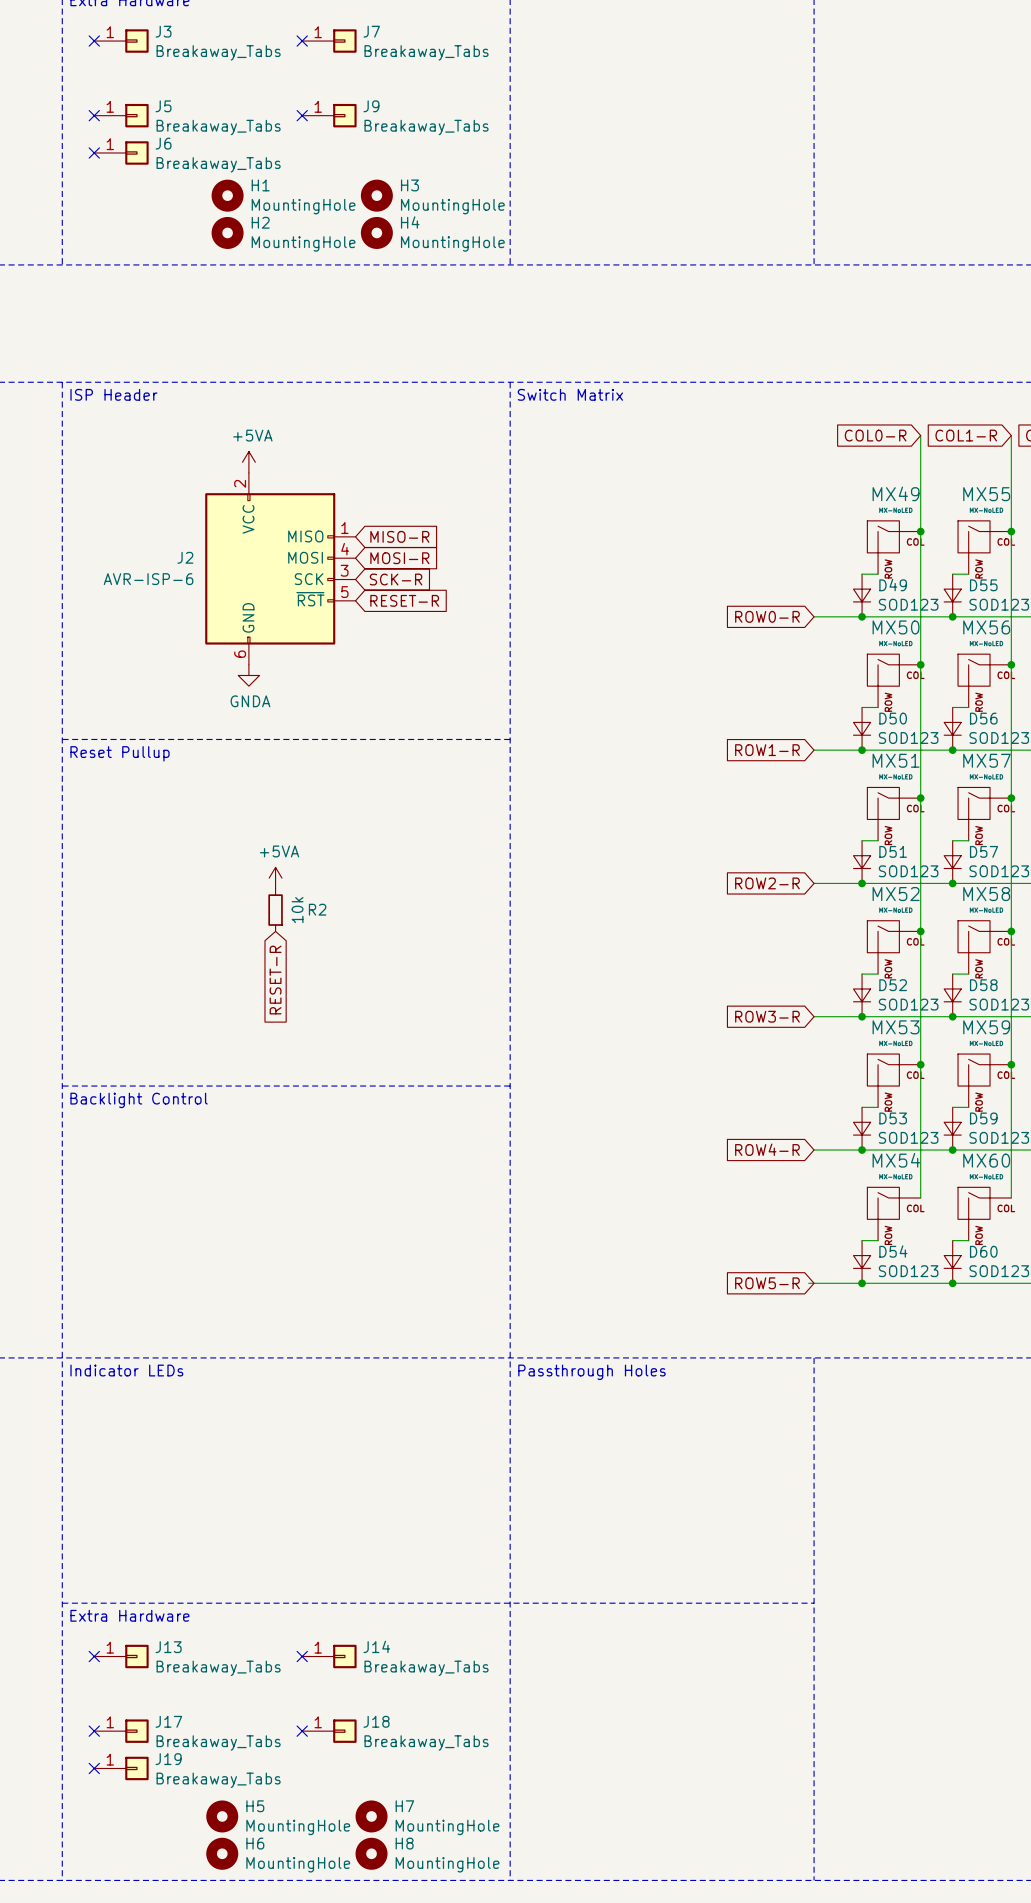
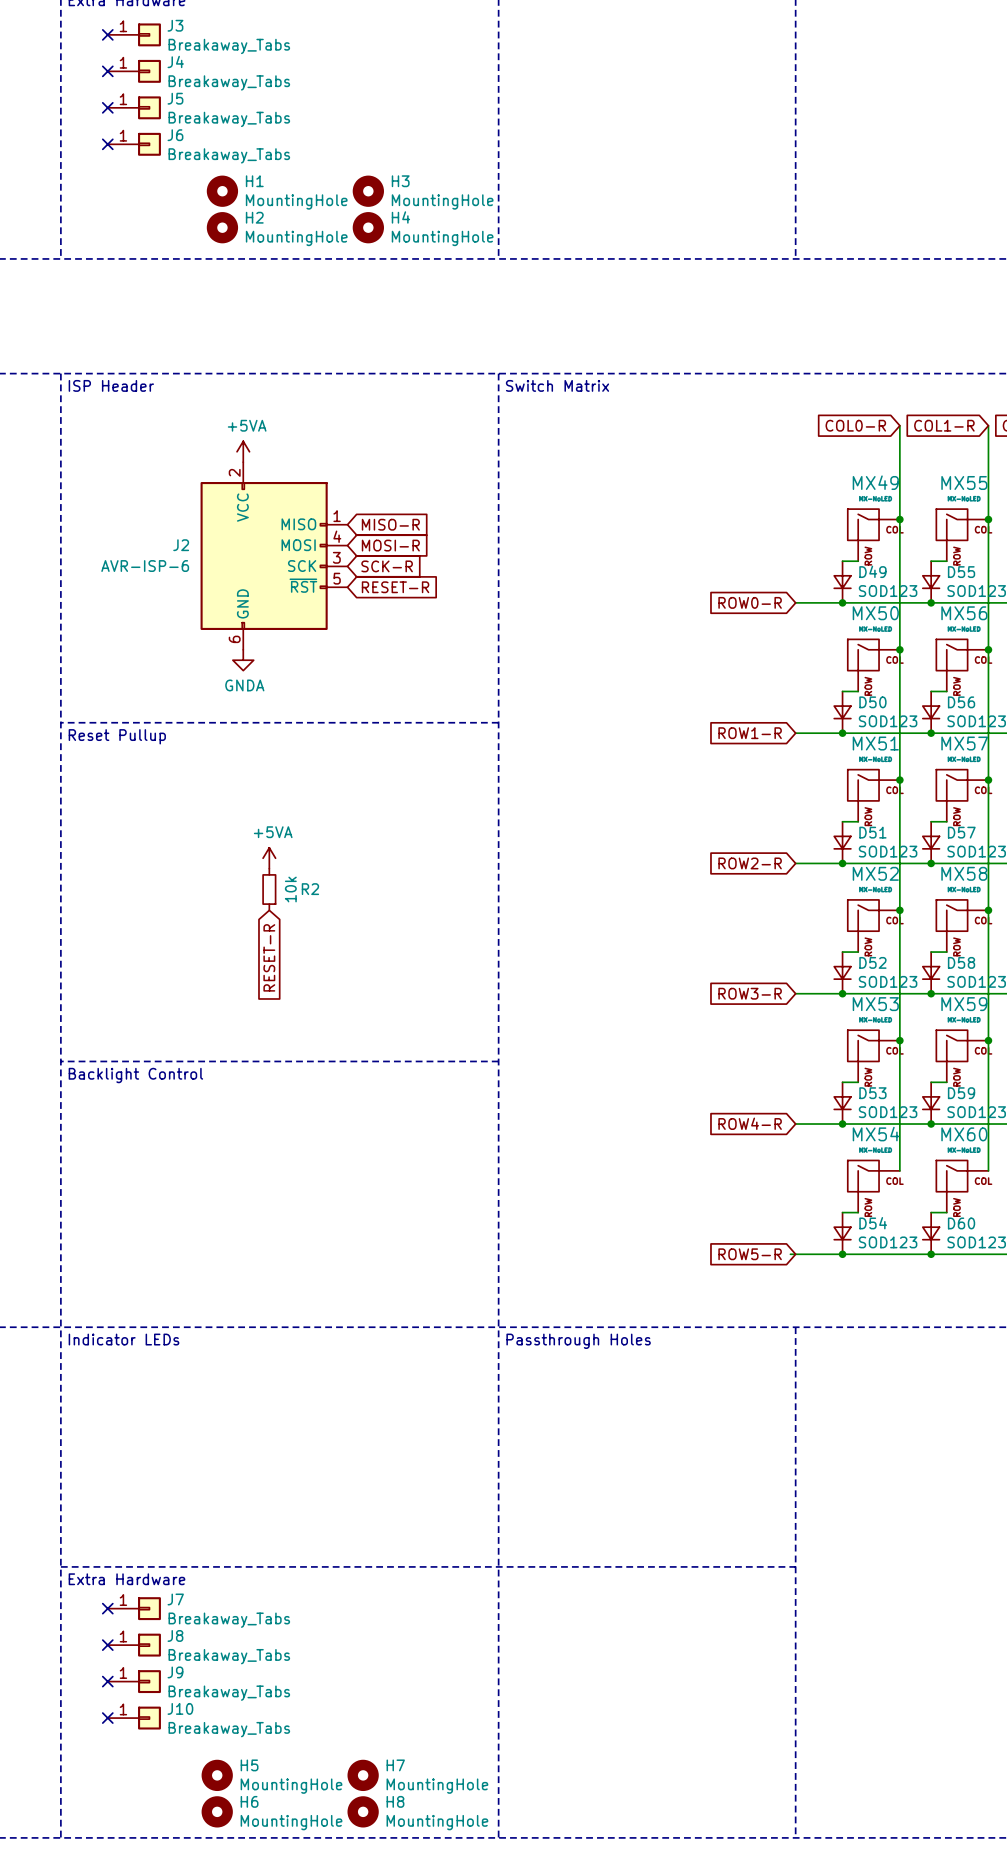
no-connect mark position: (94, 41) -> (107, 34)
J3 position: (121, 41) -> (134, 34)
no-connect mark: (302, 41) -> none
J7 position: (329, 41) -> (134, 1608)
no-connect mark: none -> (107, 71)
J4: none -> Breakaway_Tabs (134, 71)
no-connect mark position: (94, 115) -> (107, 107)
J5 position: (121, 115) -> (134, 107)
no-connect mark: (302, 115) -> none
J9 position: (329, 115) -> (134, 1681)
no-connect mark position: (94, 152) -> (107, 144)
J6 position: (121, 152) -> (134, 144)
no-connect mark: none -> (107, 1608)
no-connect mark: (94, 1656) -> none
J13: Breakaway_Tabs (121, 1656) -> none
no-connect mark: (302, 1656) -> none
J14: Breakaway_Tabs (329, 1656) -> none
no-connect mark: none -> (107, 1645)
J8: none -> Breakaway_Tabs (134, 1645)
no-connect mark: none -> (107, 1681)
no-connect mark: (94, 1731) -> none
J17: Breakaway_Tabs (121, 1731) -> none
no-connect mark: (302, 1731) -> none
J18: Breakaway_Tabs (329, 1731) -> none
no-connect mark: none -> (107, 1718)
J10: none -> Breakaway_Tabs (134, 1718)
no-connect mark: (94, 1768) -> none
J19: Breakaway_Tabs (121, 1768) -> none

